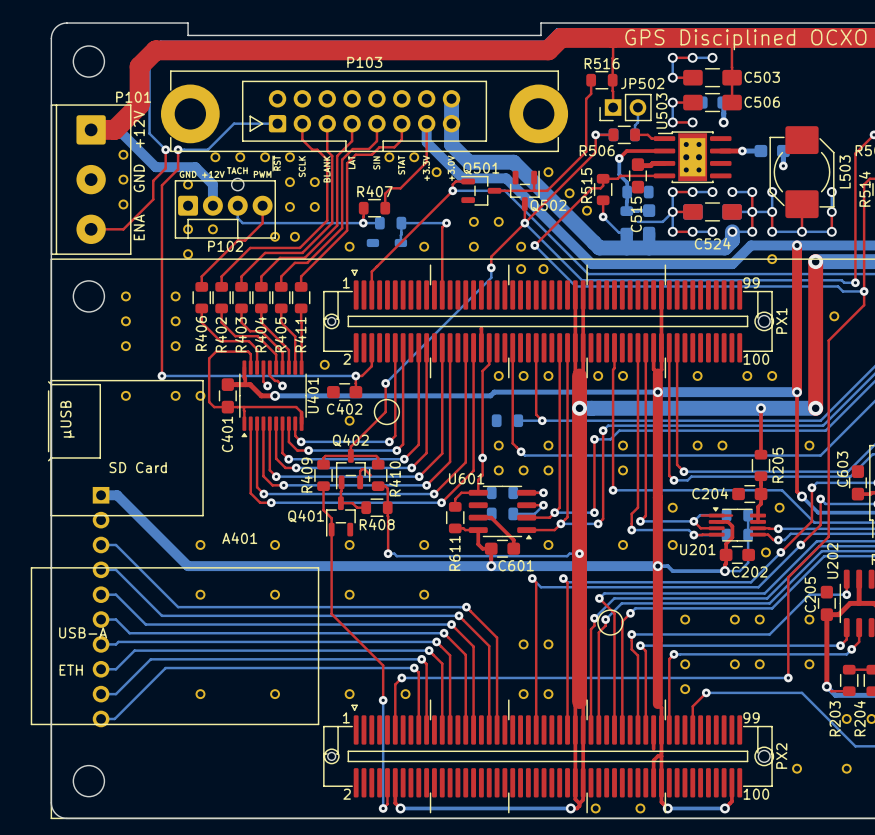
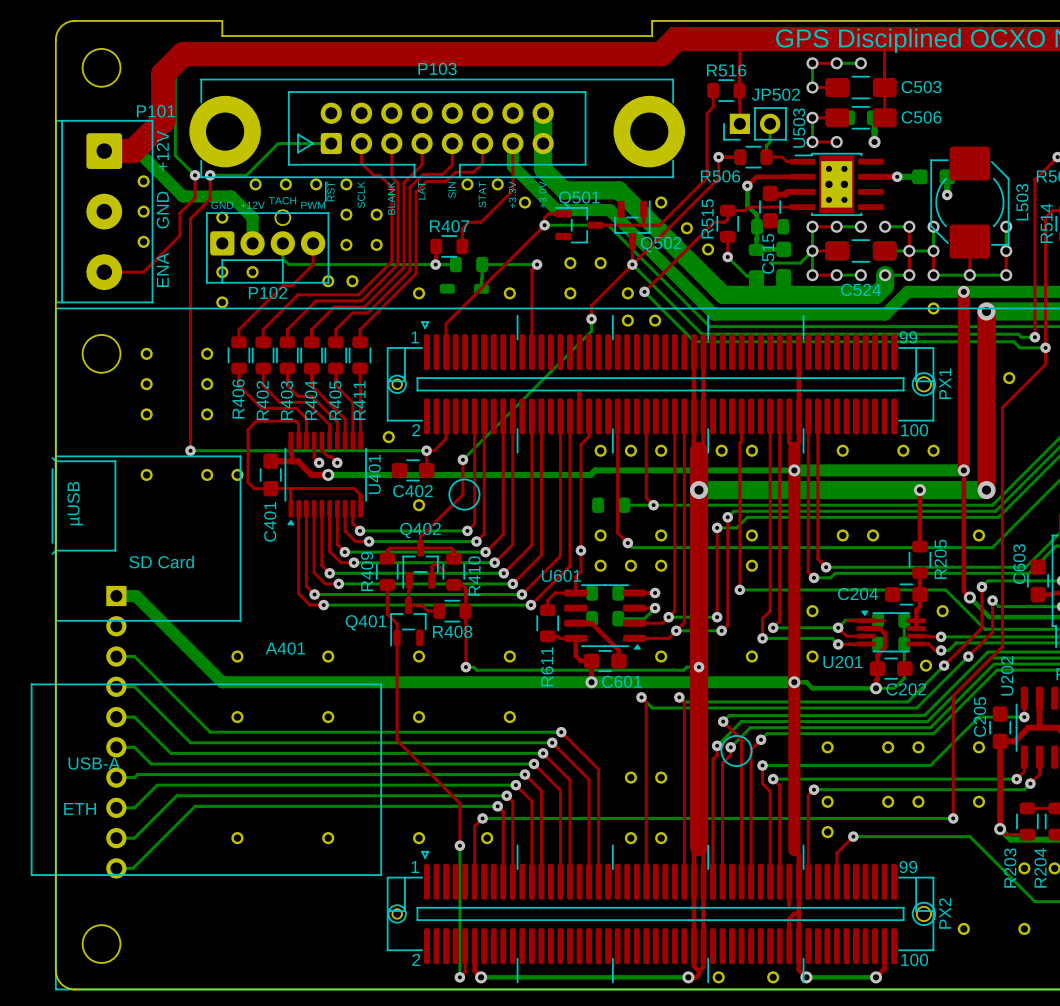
PX1 footprint: [323, 264, 773, 379] -> [386, 314, 935, 454]
PX2 footprint: [323, 699, 773, 814] -> [386, 844, 935, 984]

